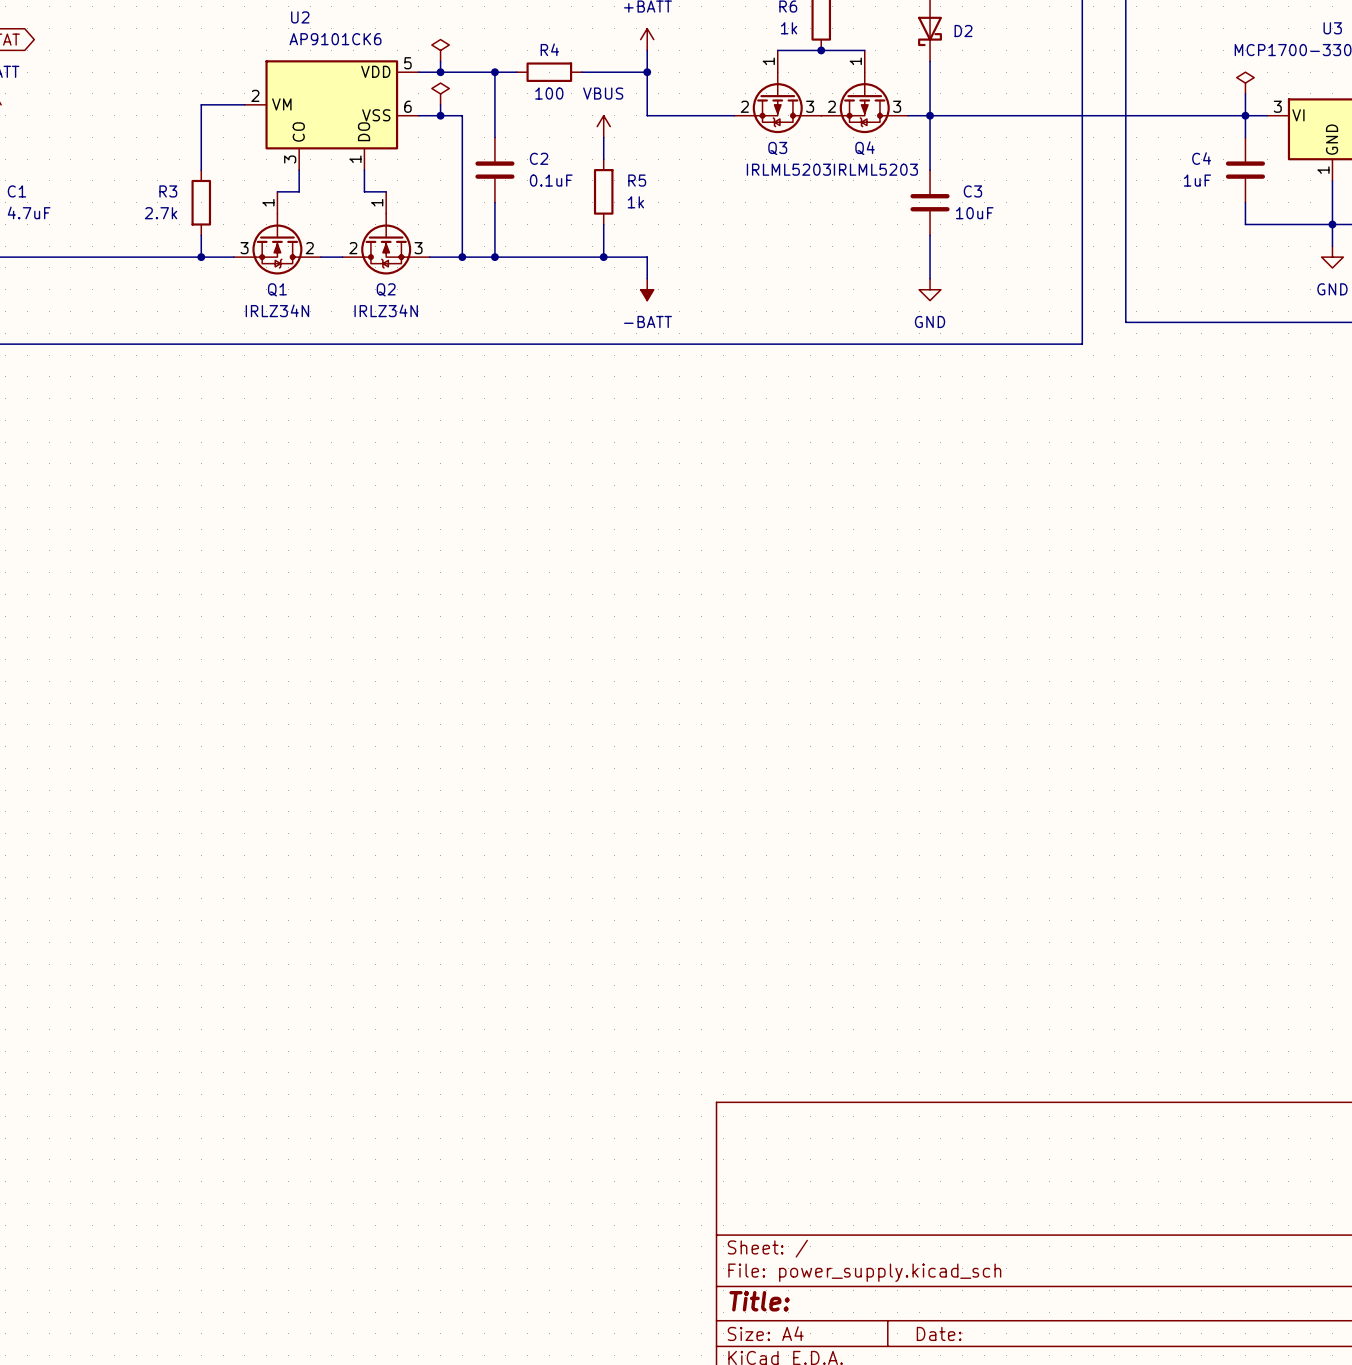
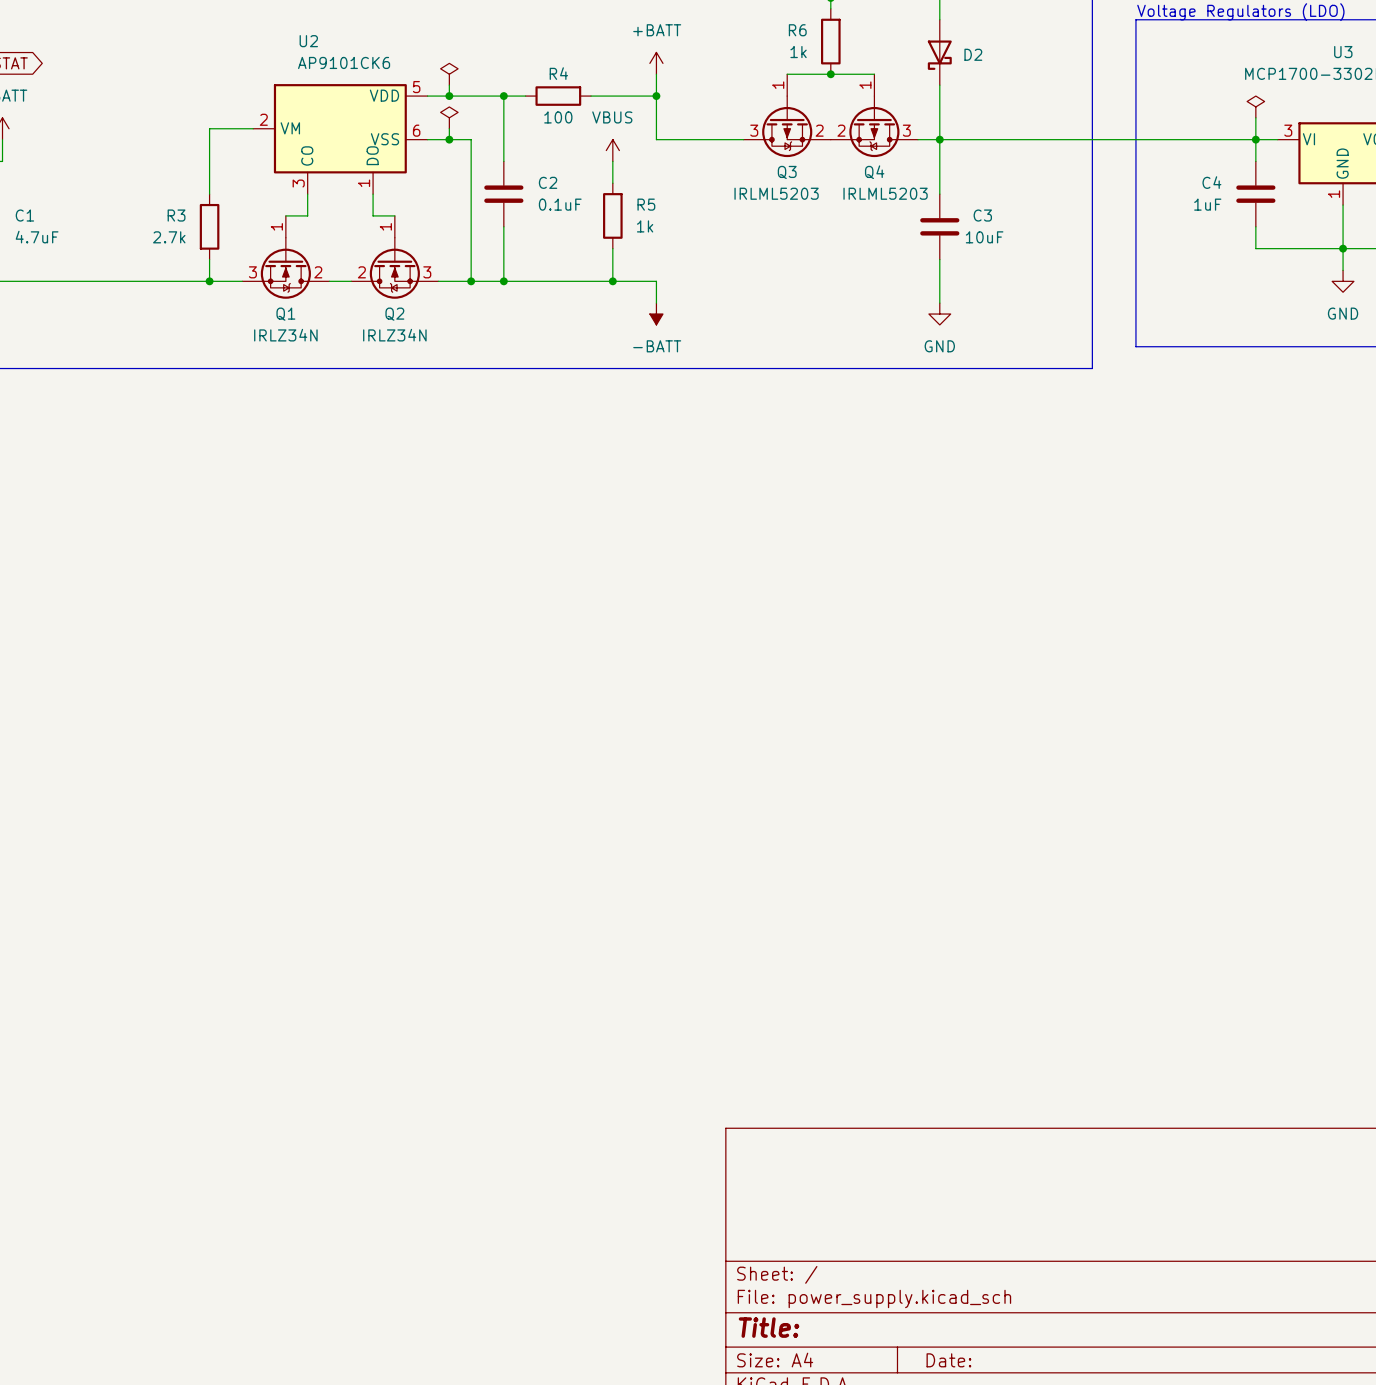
Q3 flip: as is (777, 102) -> left-right (787, 126)

